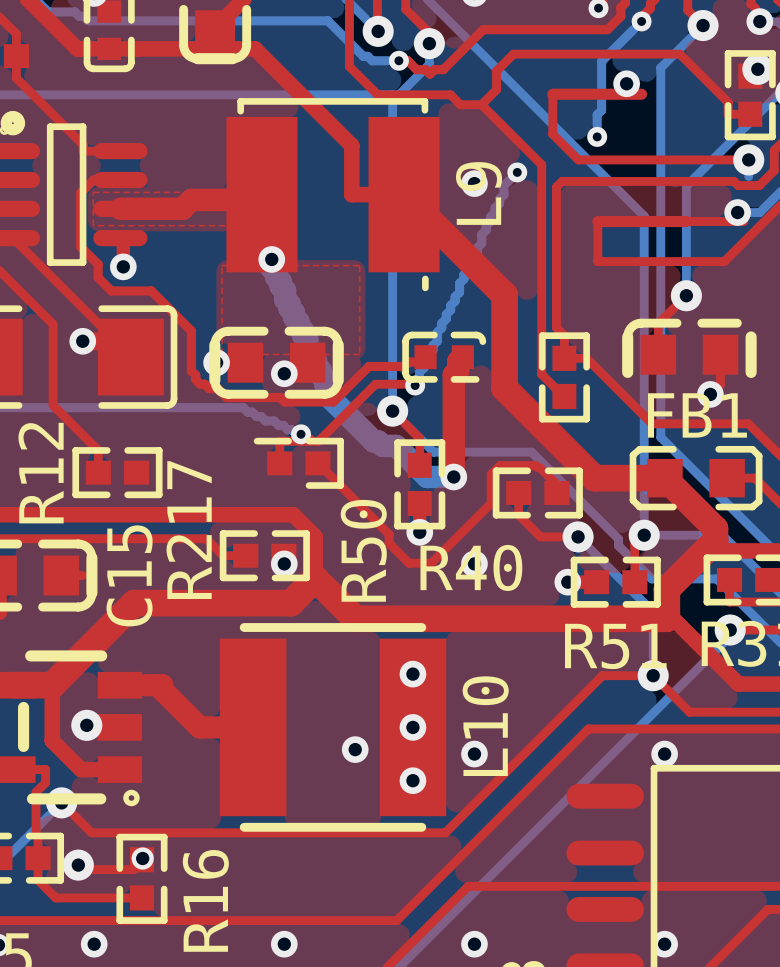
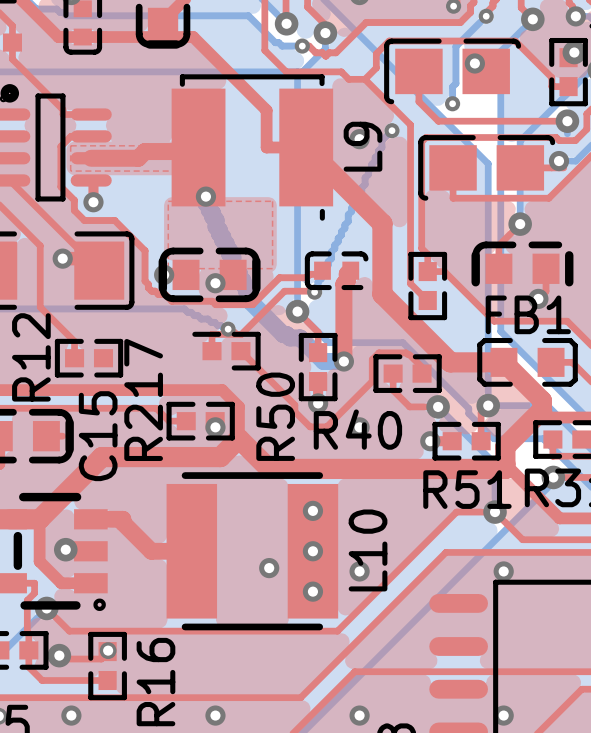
top track: (552, 94) (641, 94) -> none
part: none -> (452, 71)
top track: (597, 221) (686, 221) -> none
part: none -> (486, 167)

